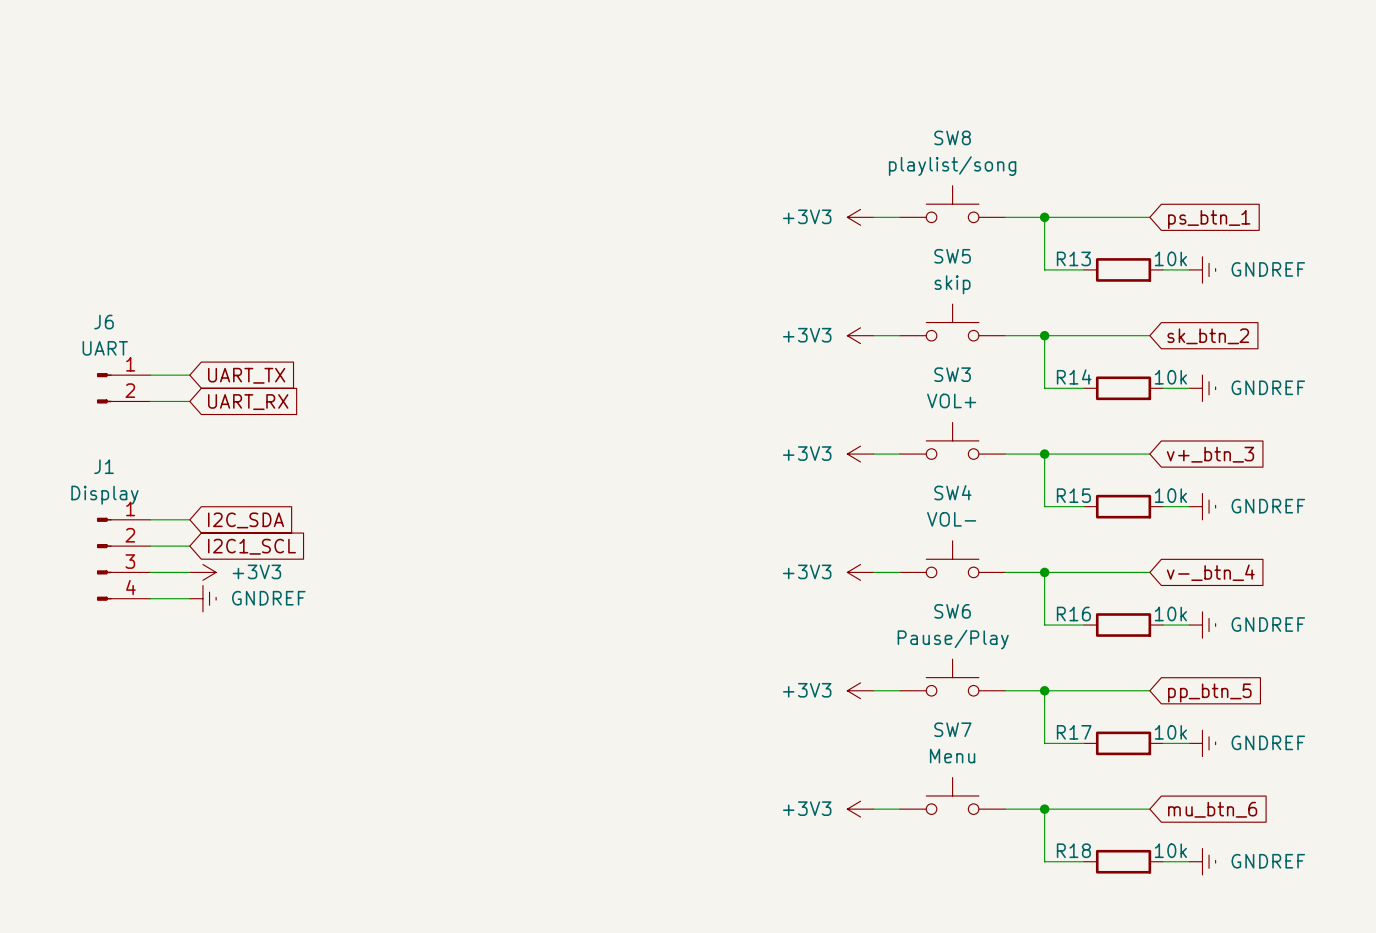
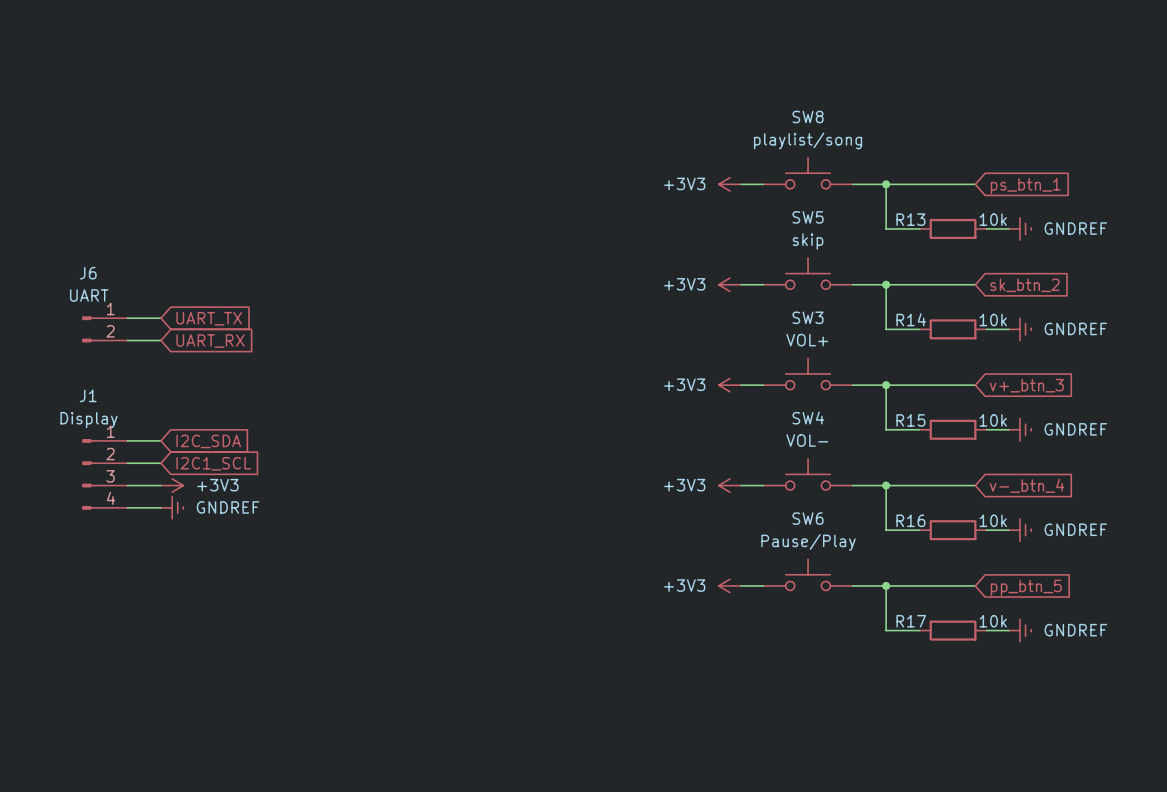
SW7: Menu (952, 795) -> none
power symbol: +3V3 (860, 809) -> none
wire: (873, 809) (899, 809) -> none
wire: (1005, 809) (1149, 809) -> none
wire: (1044, 809) (1044, 861) (1084, 861) -> none
junction: (1044, 809) -> none
global label: mu_btn_6 (1212, 809) -> none
R18: 10k (1123, 861) -> none
wire: (1162, 861) (1189, 861) -> none
power symbol: GNDREF (1202, 861) -> none

